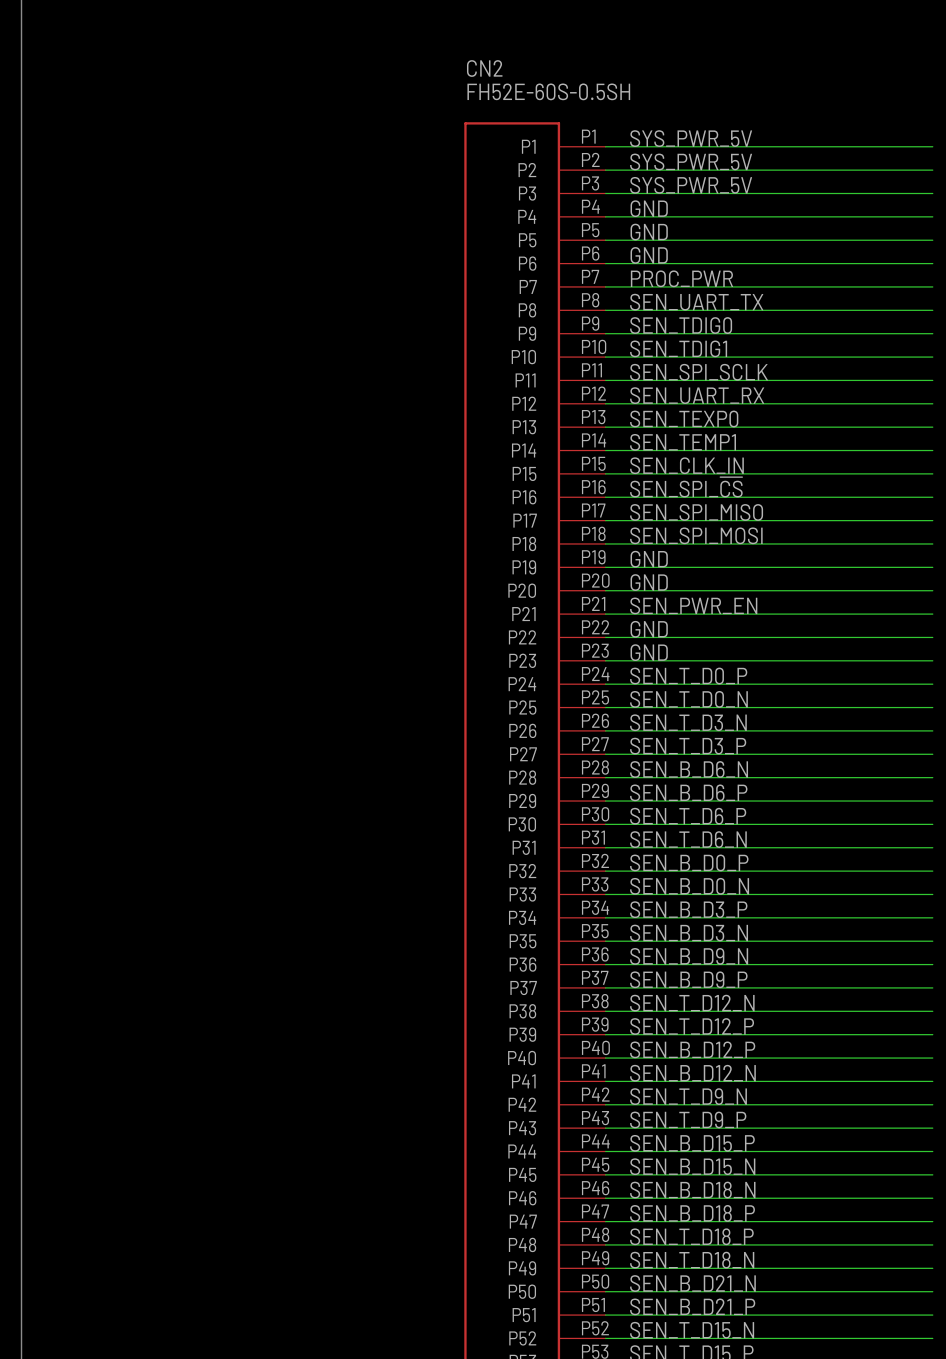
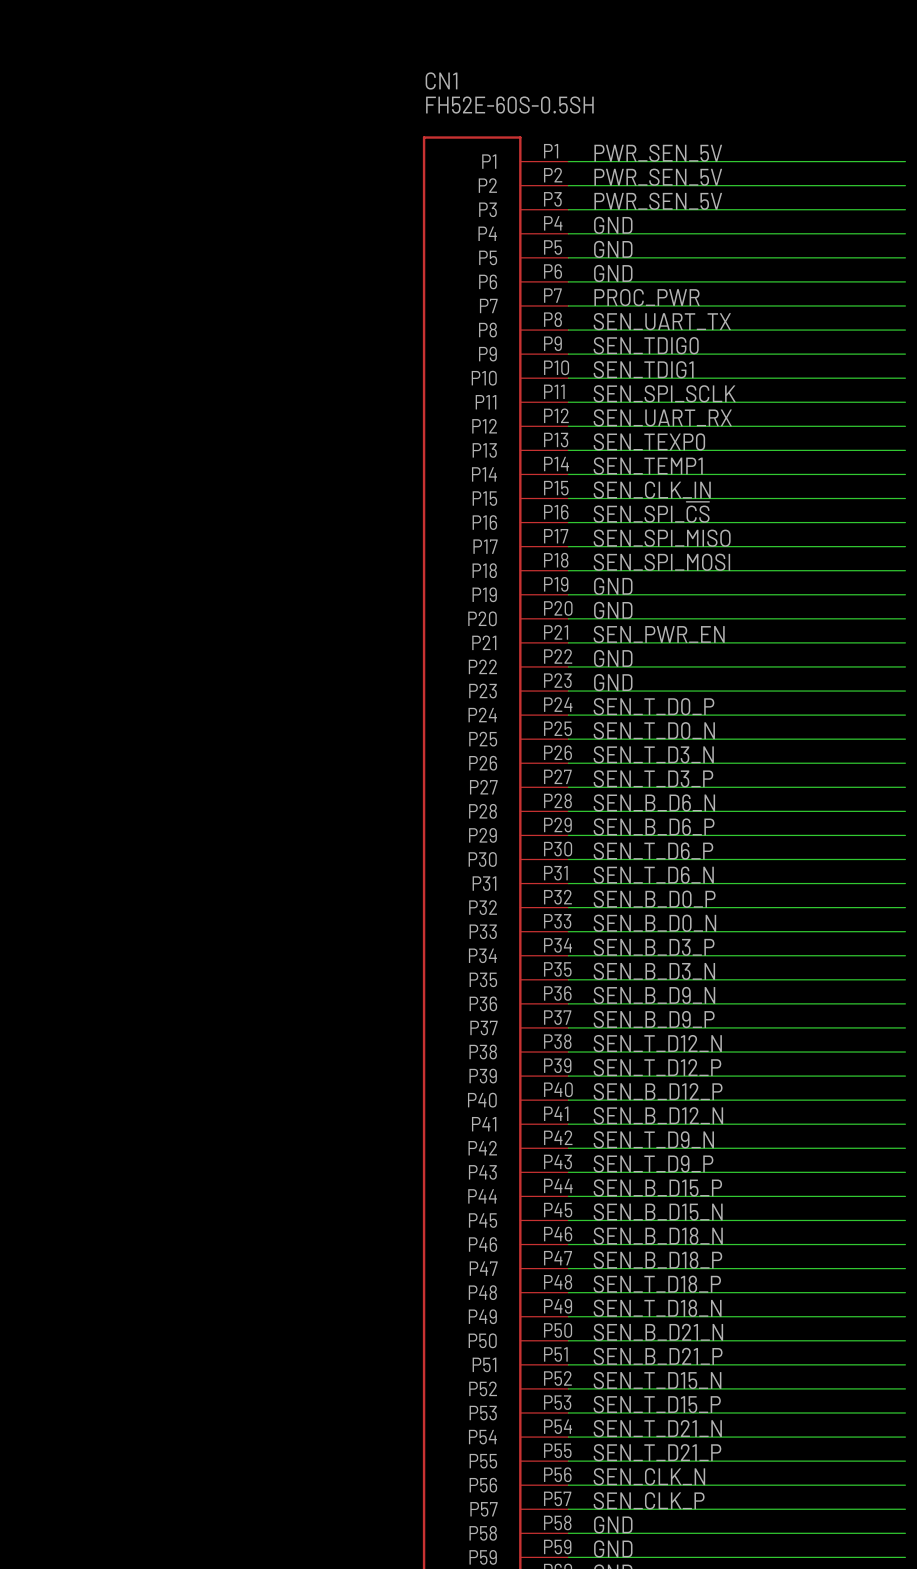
CN2 name: CN2 (484, 68) -> CN1 (441, 80)
label: SYS_PWR_5V (691, 138) -> PWR_SEN_5V (658, 153)
label: SYS_PWR_5V (691, 161) -> PWR_SEN_5V (658, 177)
label: SYS_PWR_5V (691, 185) -> PWR_SEN_5V (658, 201)

